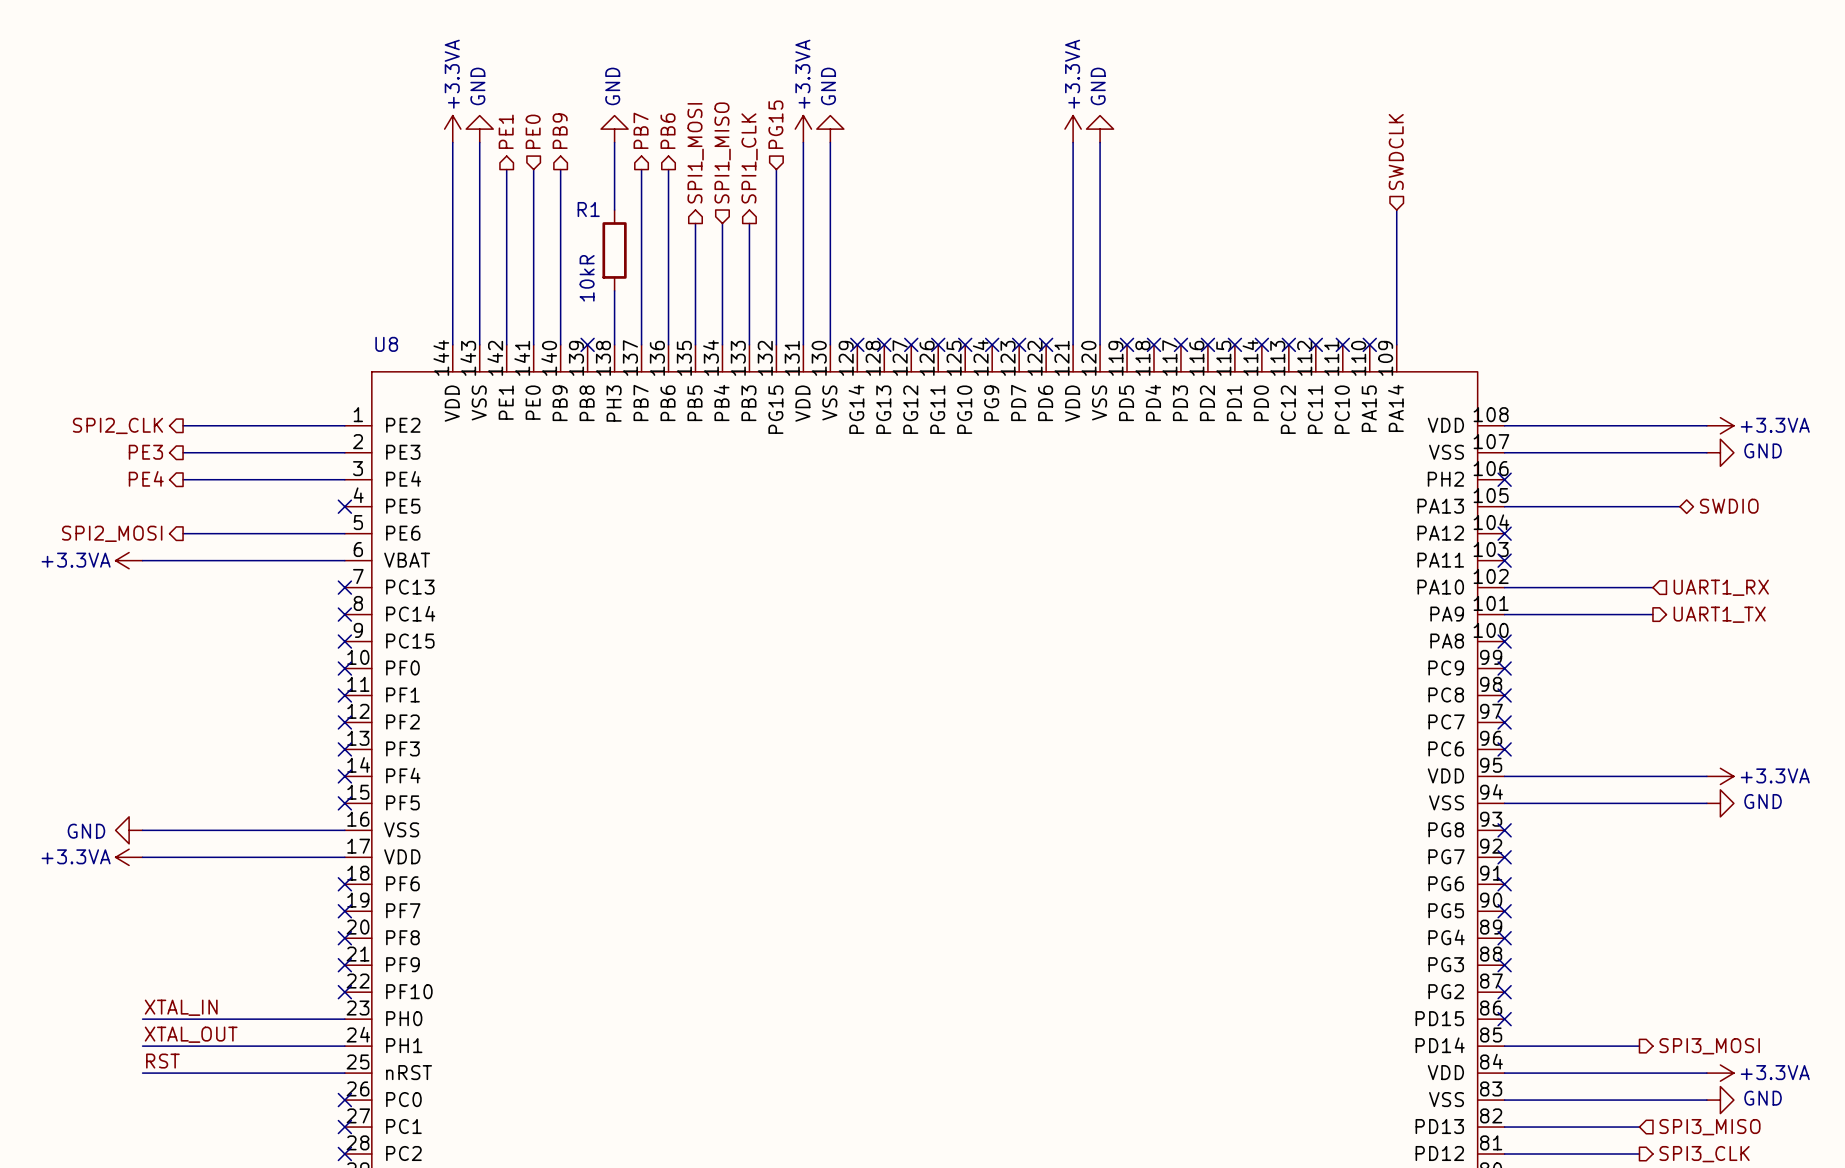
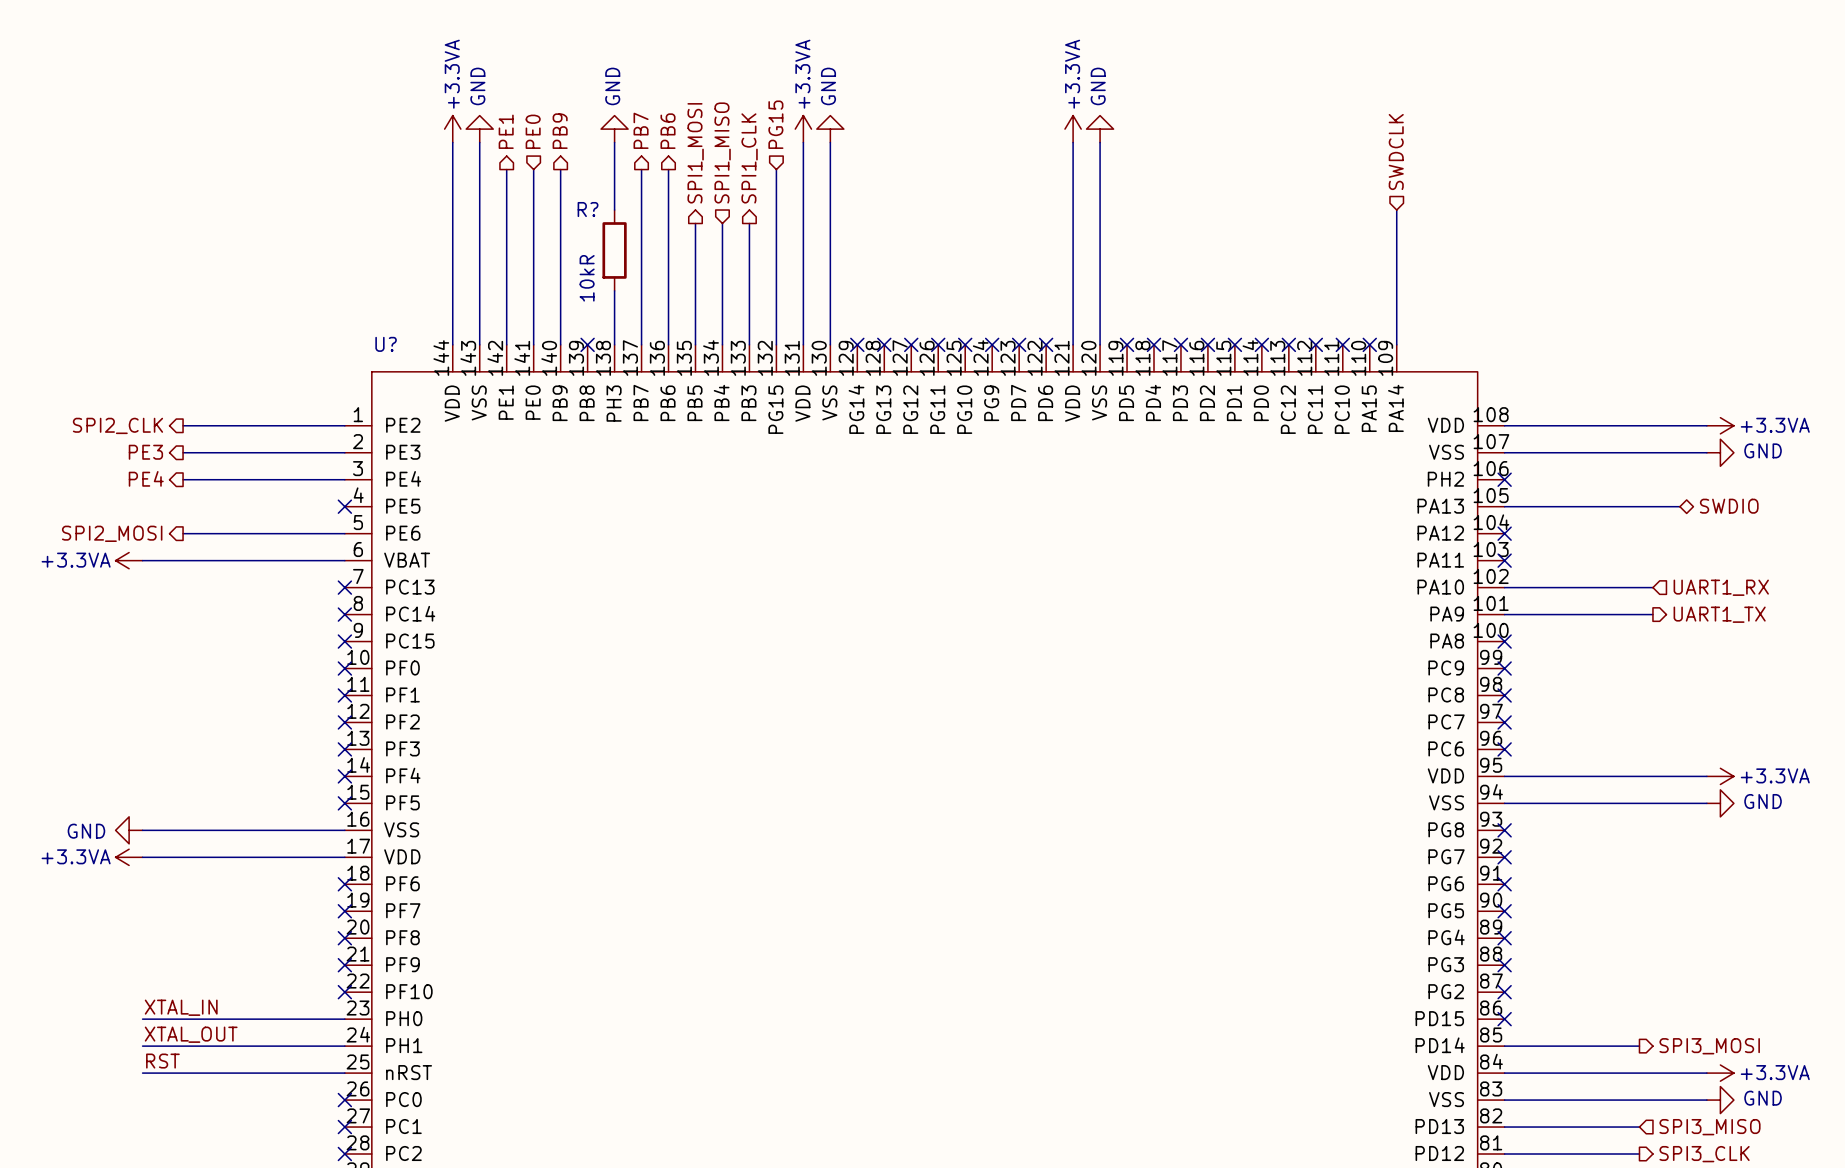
R1 name: R1 (588, 209) -> R? (588, 209)
U8 name: U8 (386, 344) -> U? (386, 344)

